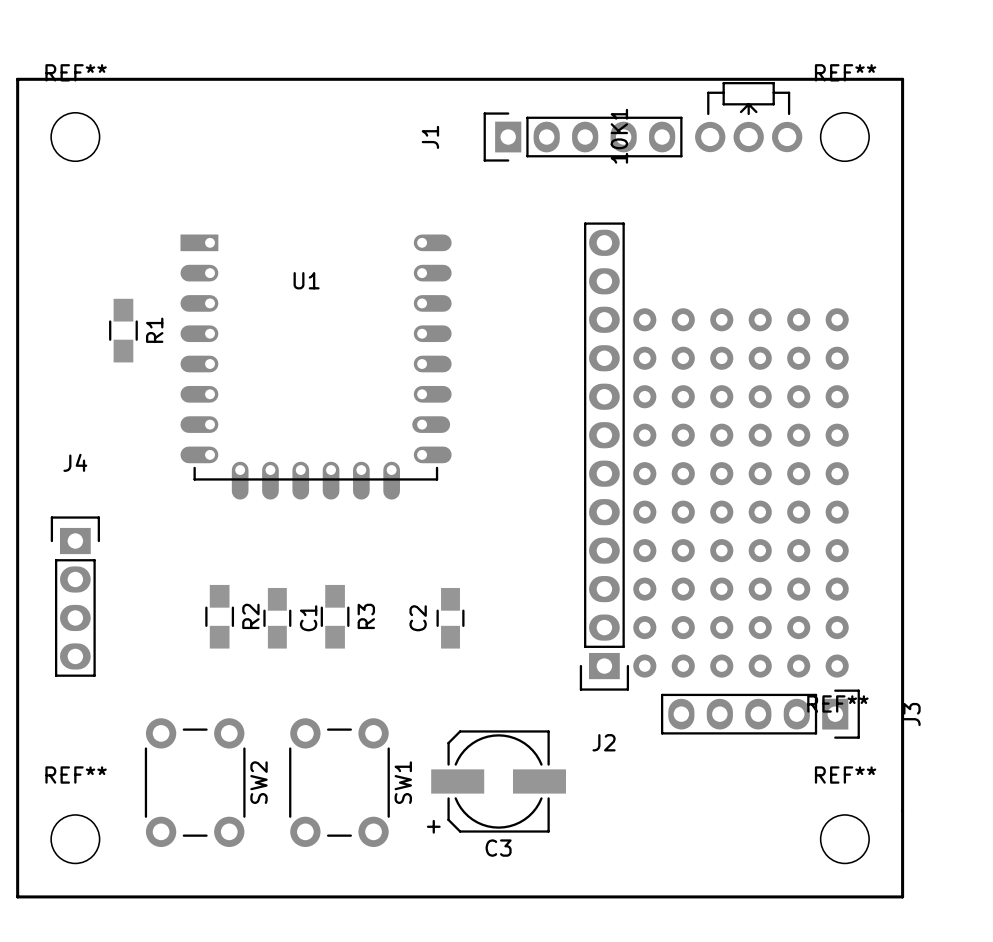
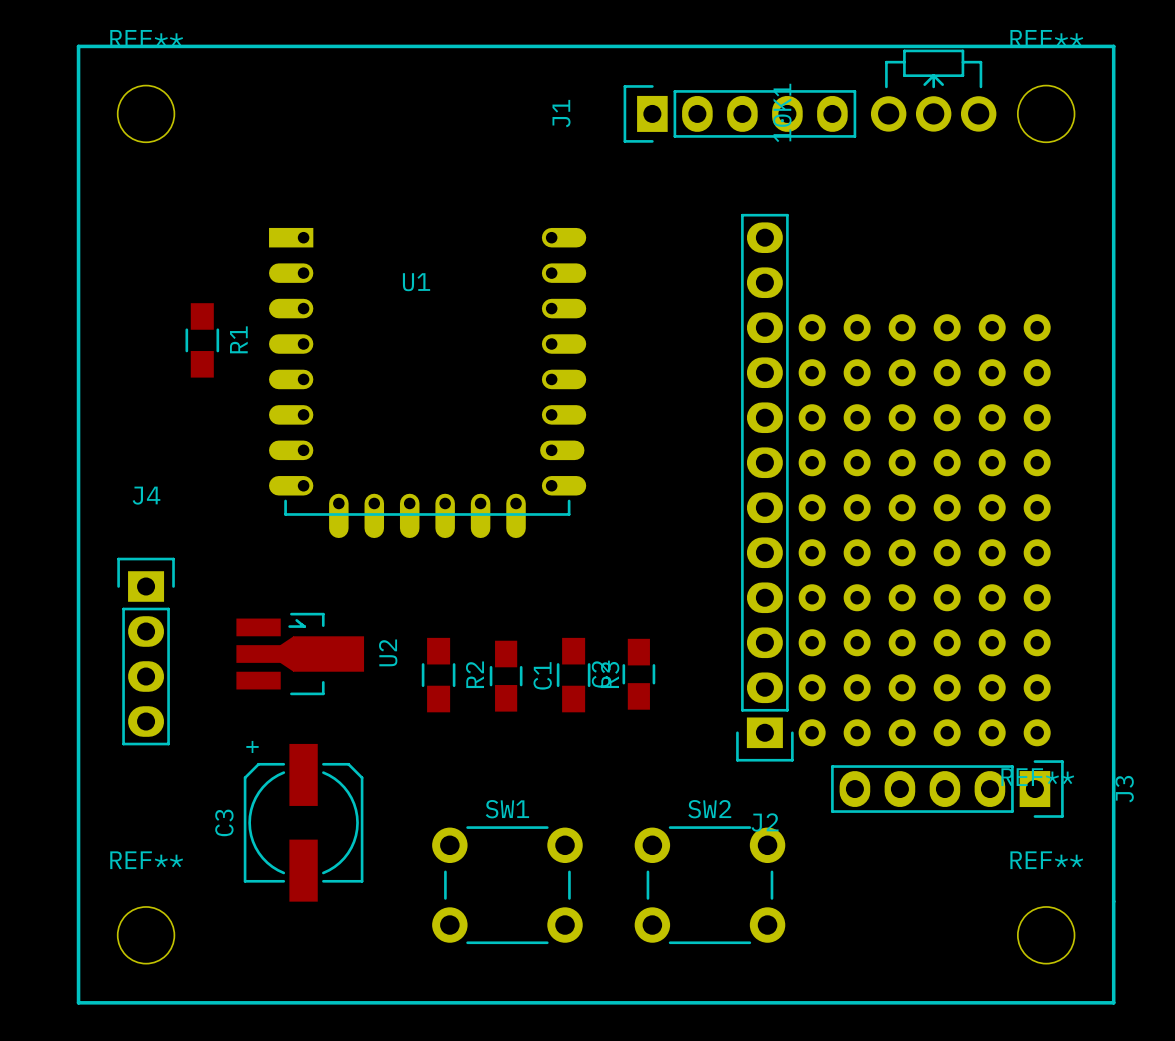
U2: none -> (300, 654)
R2 position: (219, 616) -> (438, 675)
R3 position: (335, 616) -> (573, 675)
C1 position: (277, 618) -> (506, 676)
C2 position: (450, 618) -> (638, 674)
C3 rotation: 0° (498, 781) -> 90° clockwise (303, 822)
C3 position: (498, 781) -> (303, 822)
SW2 rotation: 0° (195, 782) -> 90° clockwise (709, 885)
SW2 position: (195, 782) -> (709, 885)
SW2 name position: SW2 (258, 782) -> SW2 (709, 809)
SW1 rotation: 0° (339, 782) -> 90° clockwise (507, 885)
SW1 name position: SW1 (403, 782) -> SW1 (507, 809)

